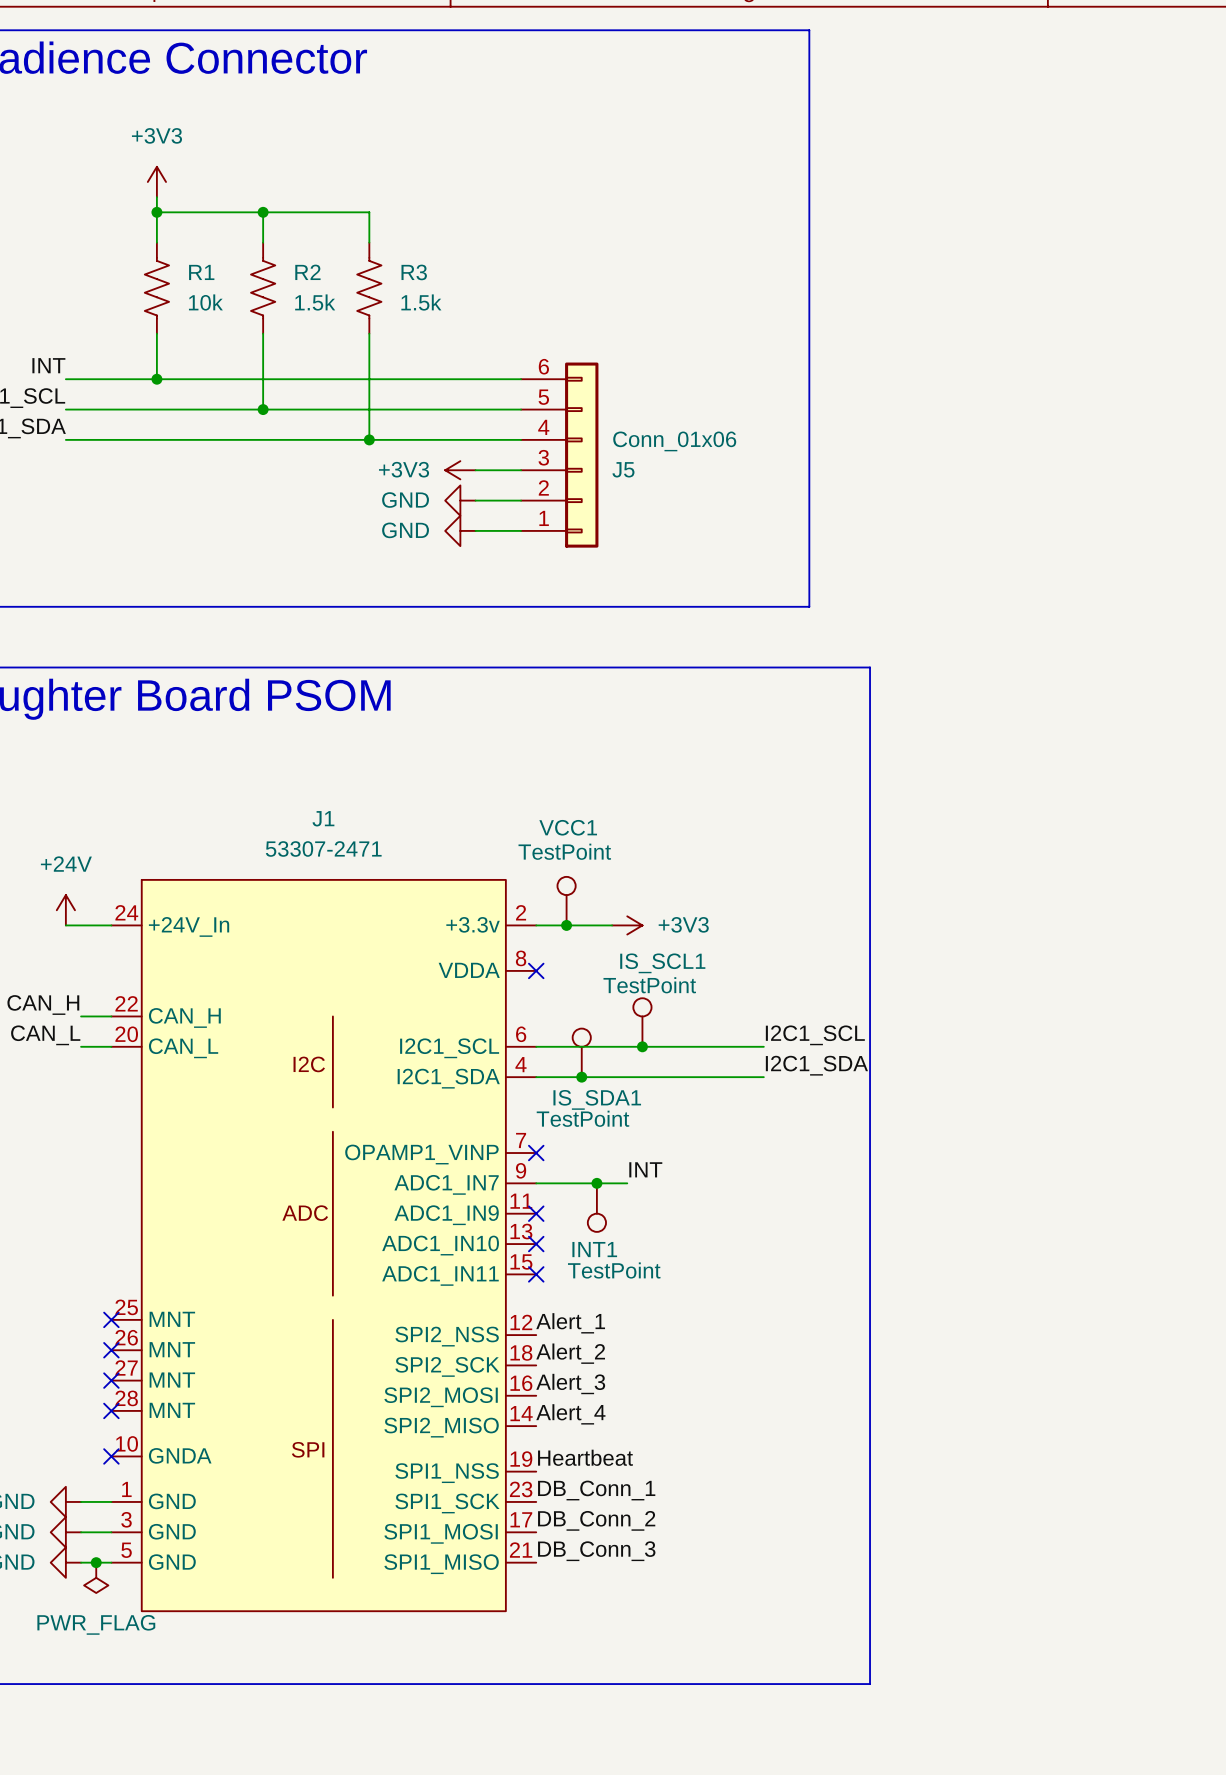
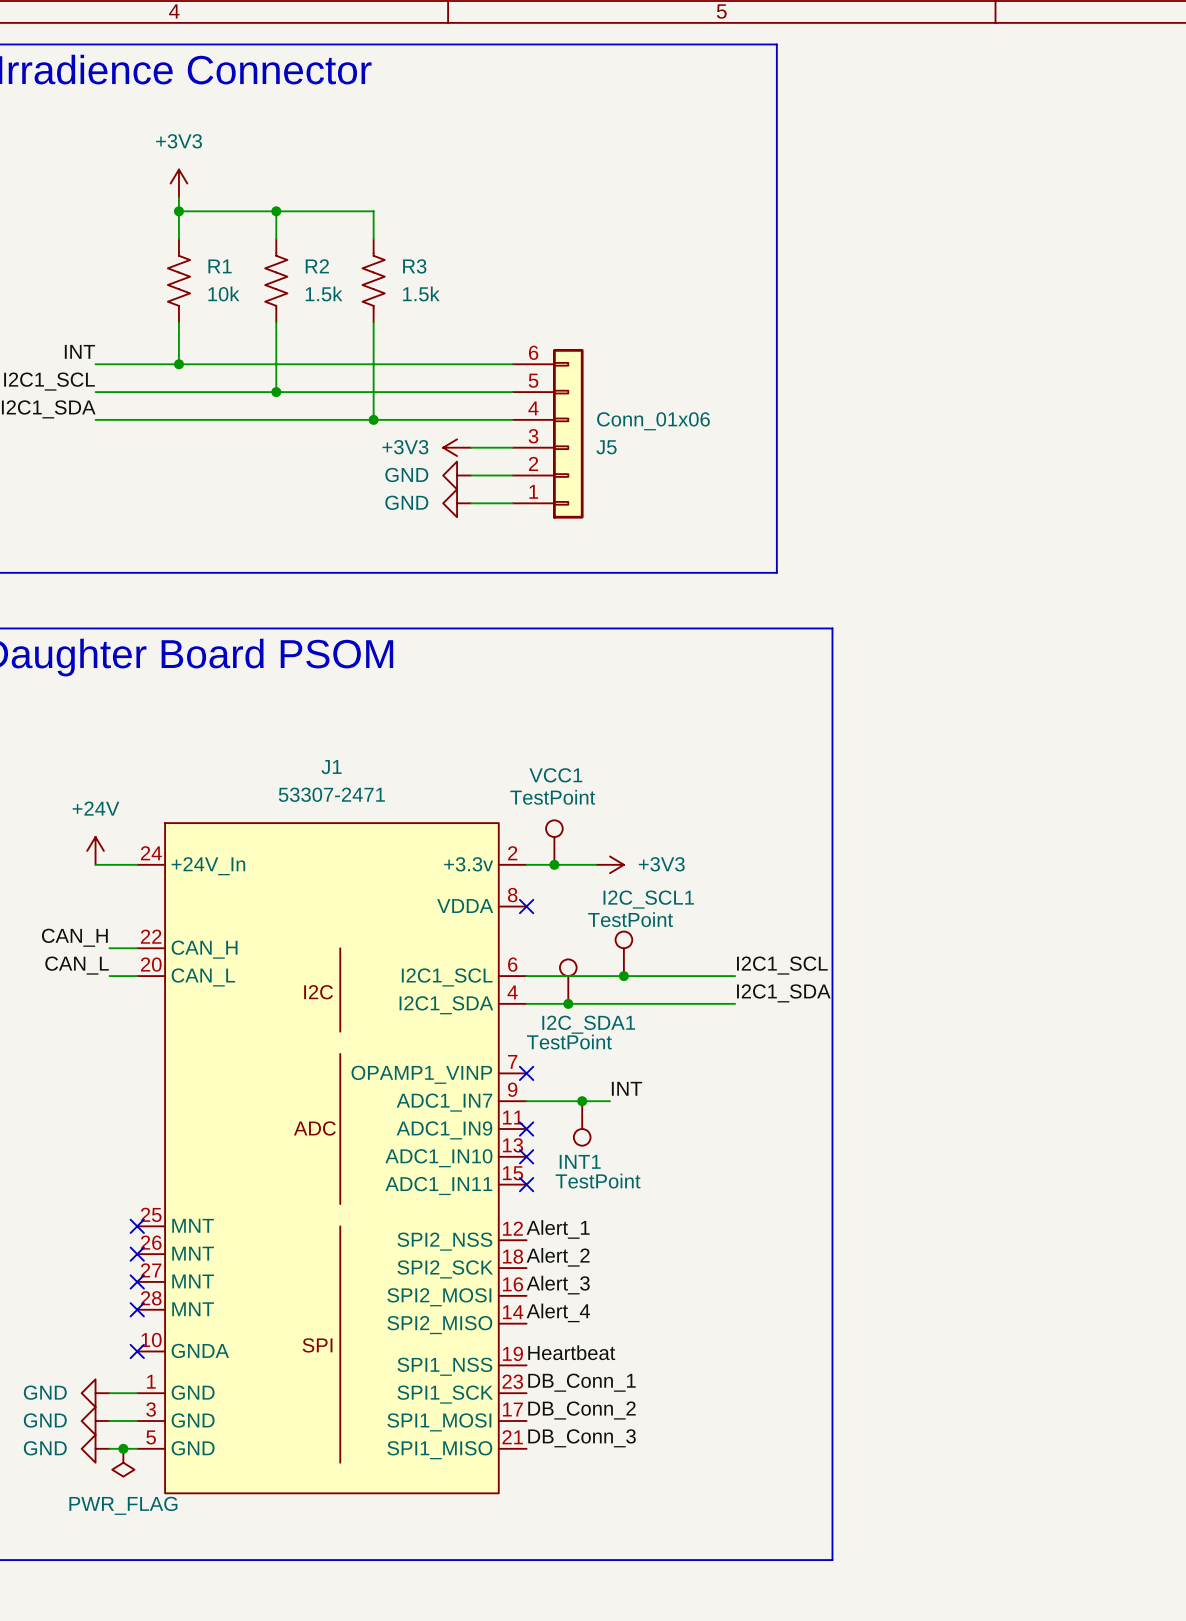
IS_SCL1 name: IS_SCL1 (662, 963) -> I2C_SCL1 (648, 899)
IS_SDA1 name: IS_SDA1 (597, 1099) -> I2C_SDA1 (588, 1024)

